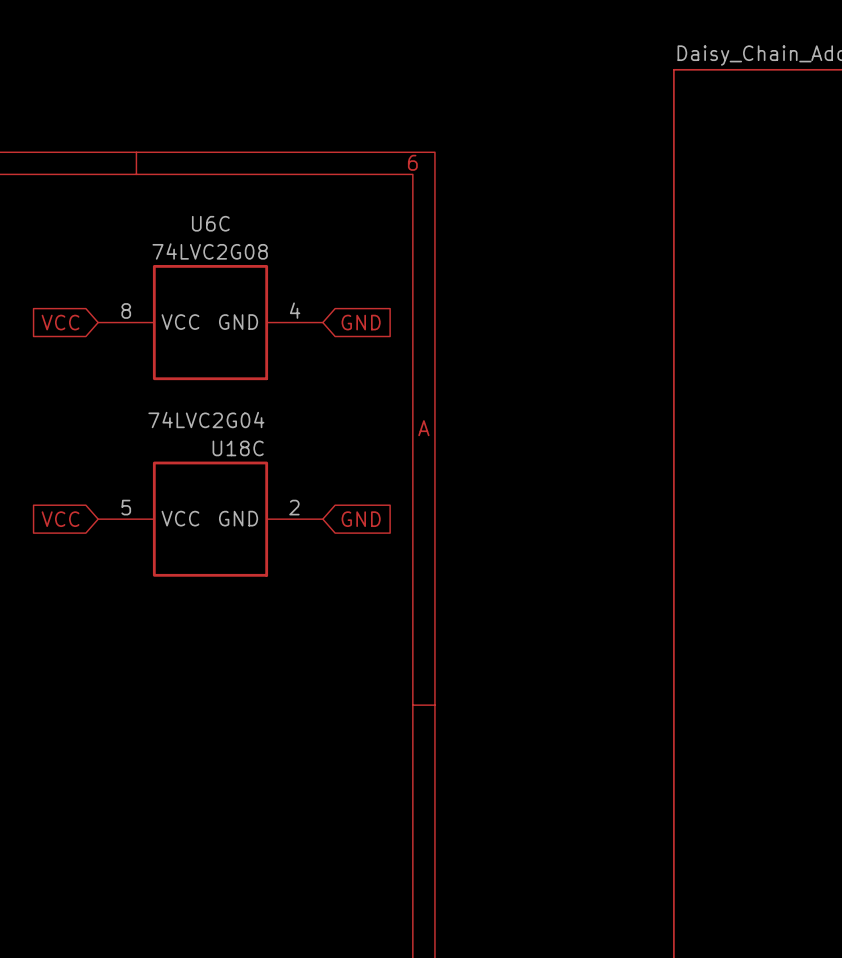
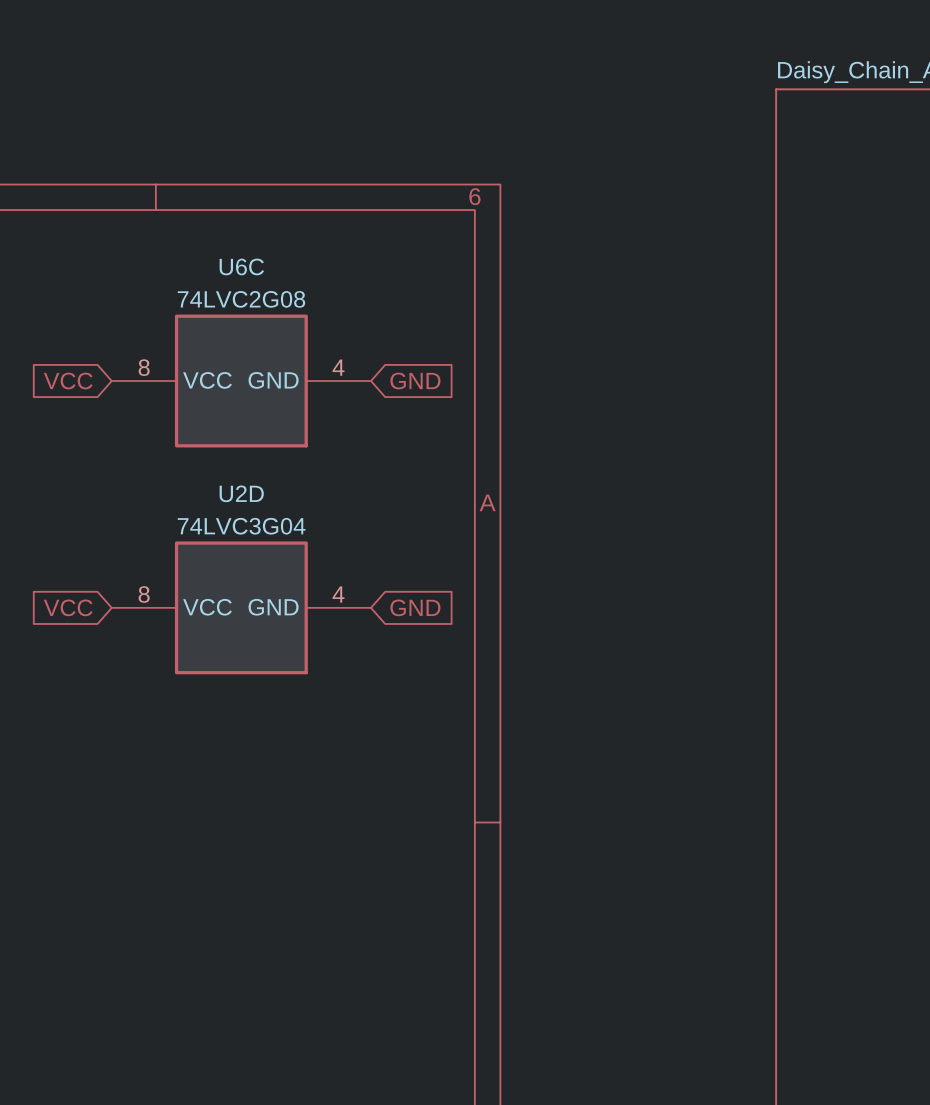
U18C value: 74LVC2G04 (206, 420) -> 74LVC3G04 (241, 526)
U18C name: U18C (238, 448) -> U2D (241, 493)
U18C pin number: 5 (126, 507) -> 8 (144, 594)
U18C pin number: 2 (294, 507) -> 4 (338, 594)

